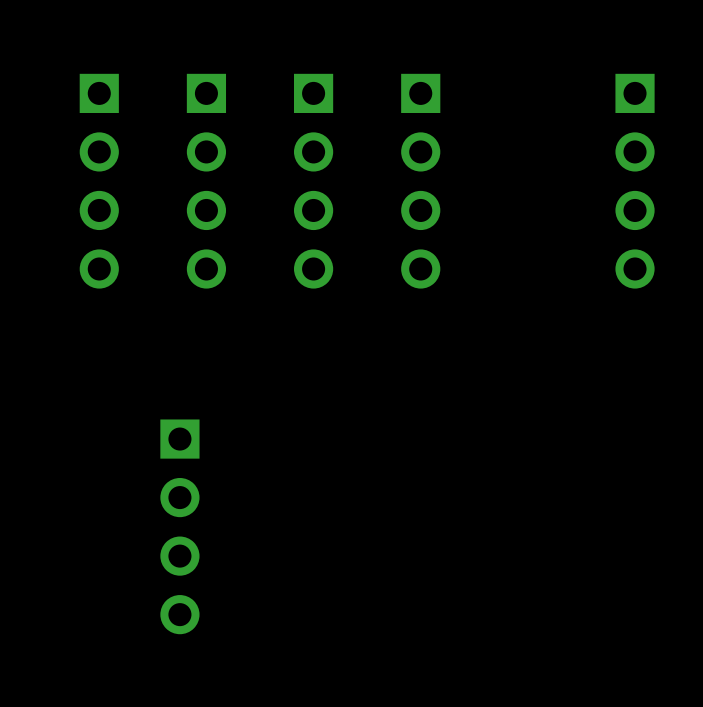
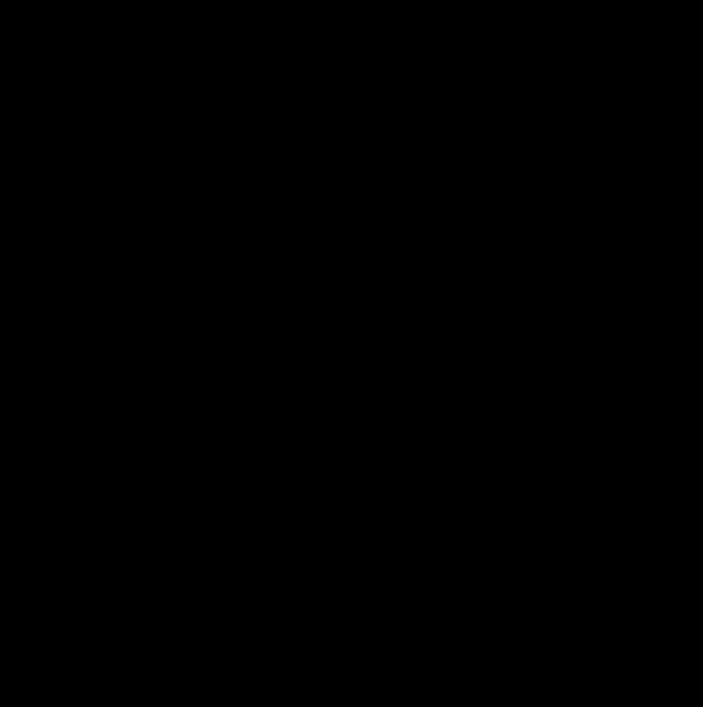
part: (99, 181) -> none
part: (206, 181) -> none
part: (313, 181) -> none
part: (420, 181) -> none
part: (635, 181) -> none
part: (179, 526) -> none

